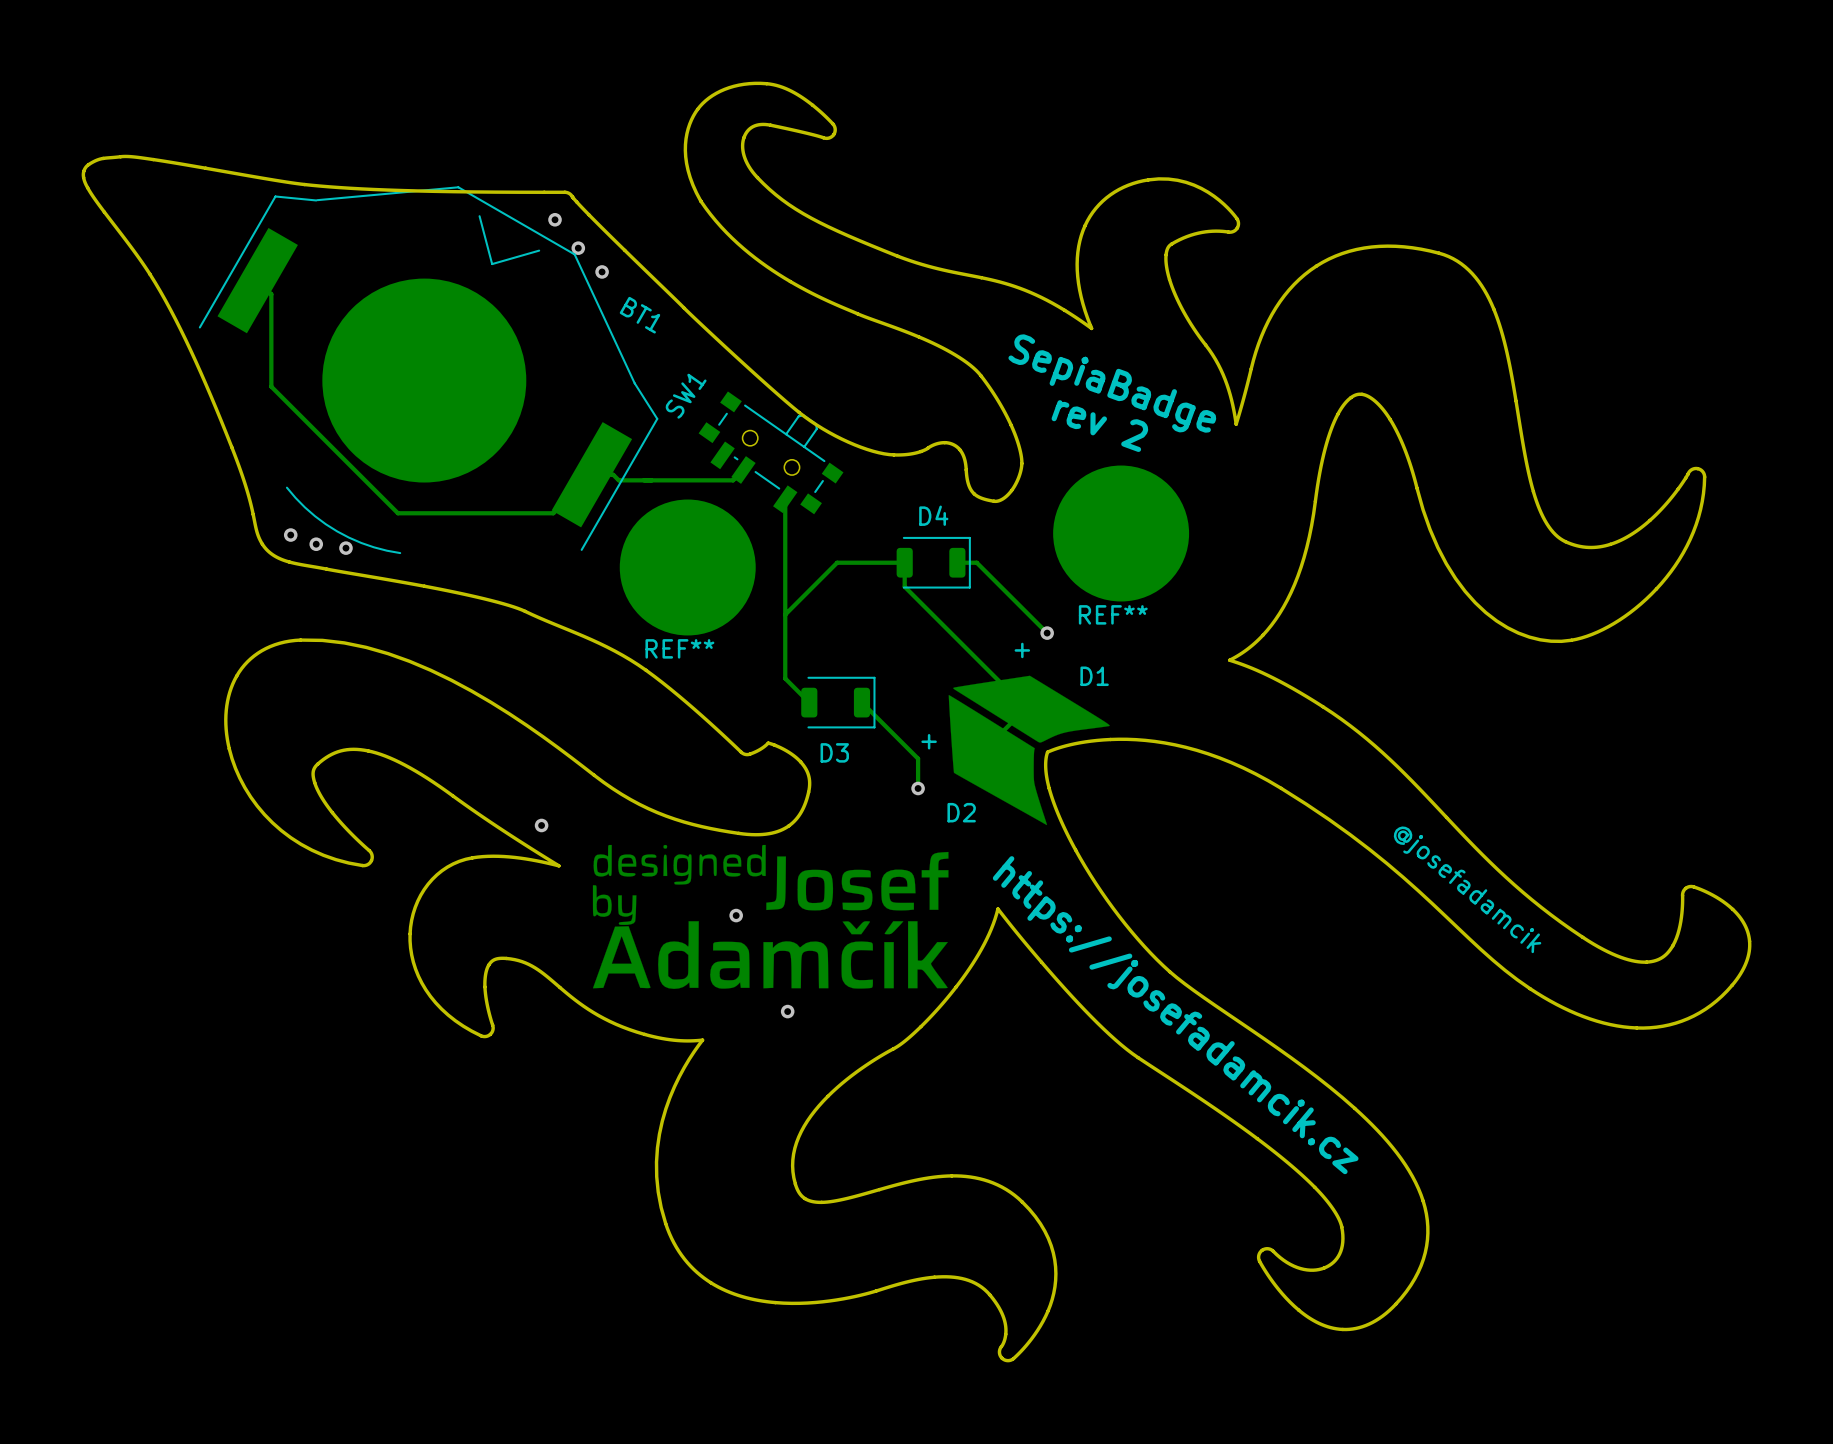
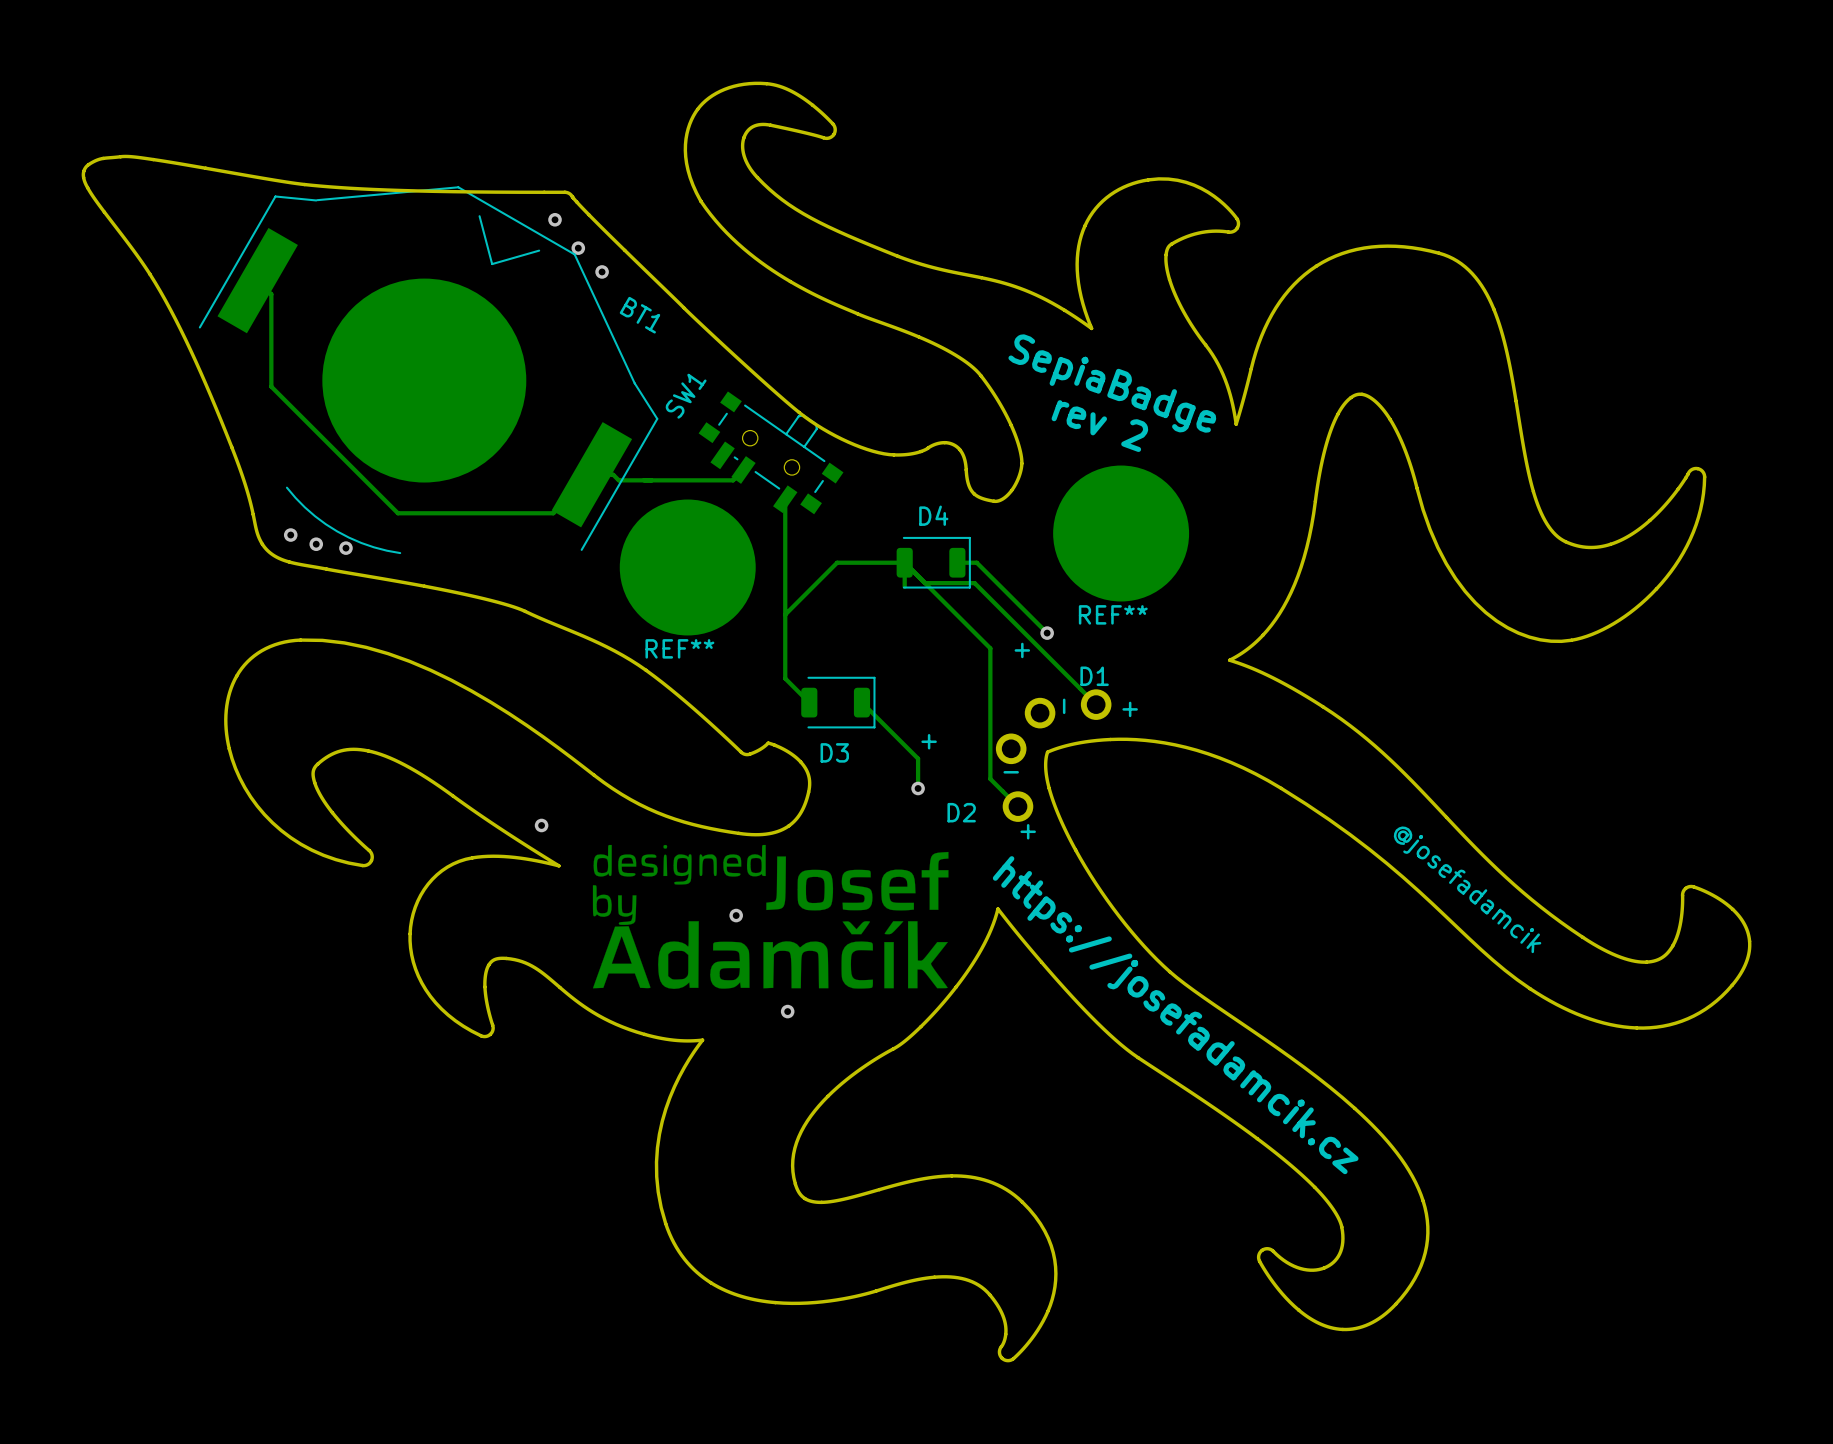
track: none -> (904, 562) (990, 648) (990, 778) (1017, 806)
track: none -> (925, 583) (974, 583) (1096, 704)
track: (904, 586) (1026, 708) (995, 738) (995, 756) -> none
part: (1029, 750) -> none
part: none -> (1053, 755)

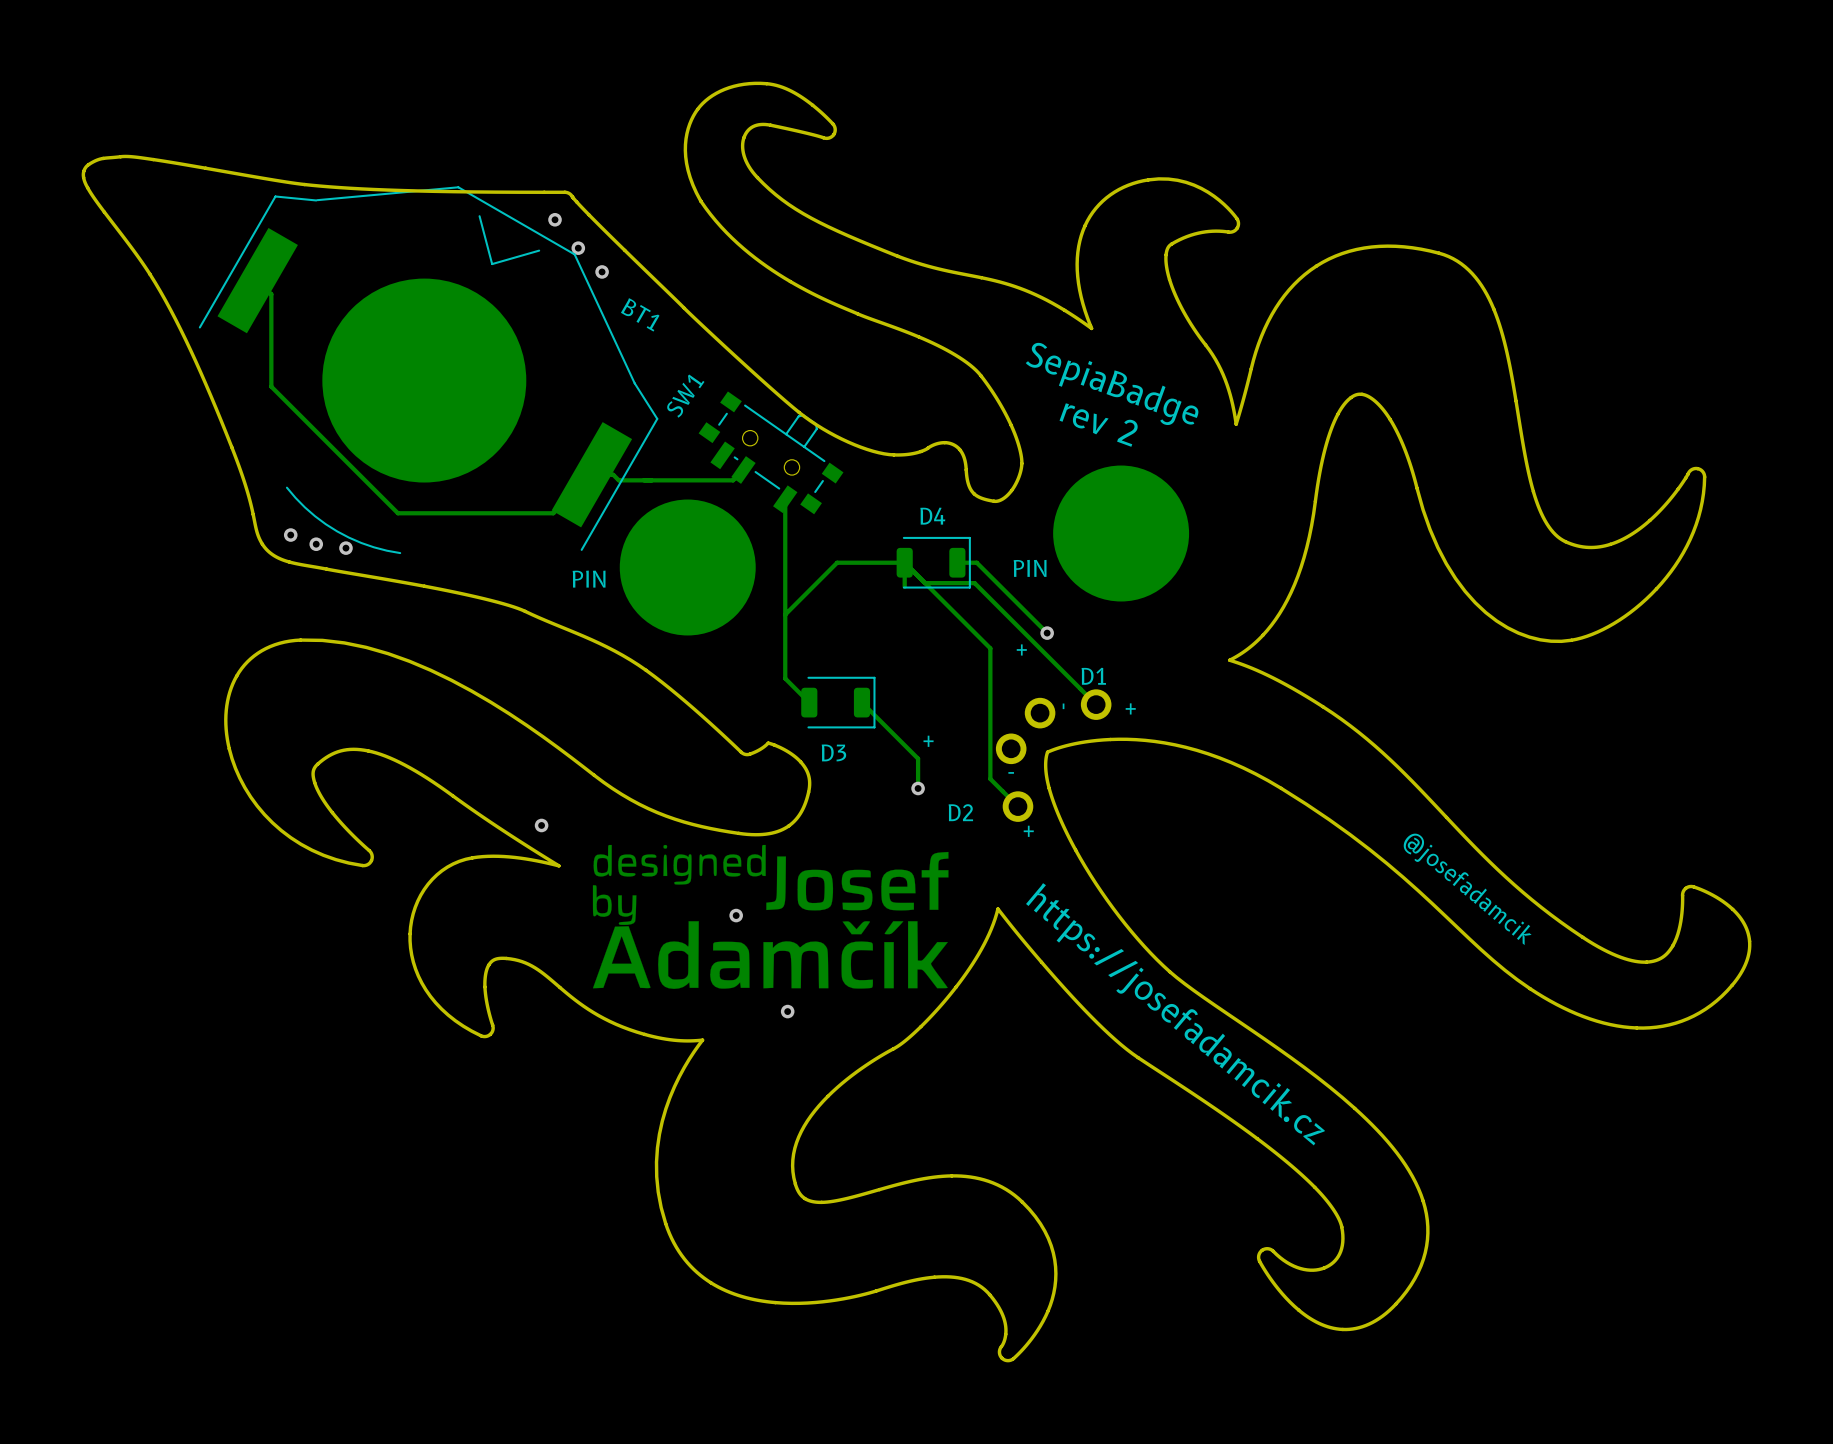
REF** name: REF** (1113, 614) -> PIN (1030, 568)
REF** name: REF** (679, 648) -> PIN (589, 579)

